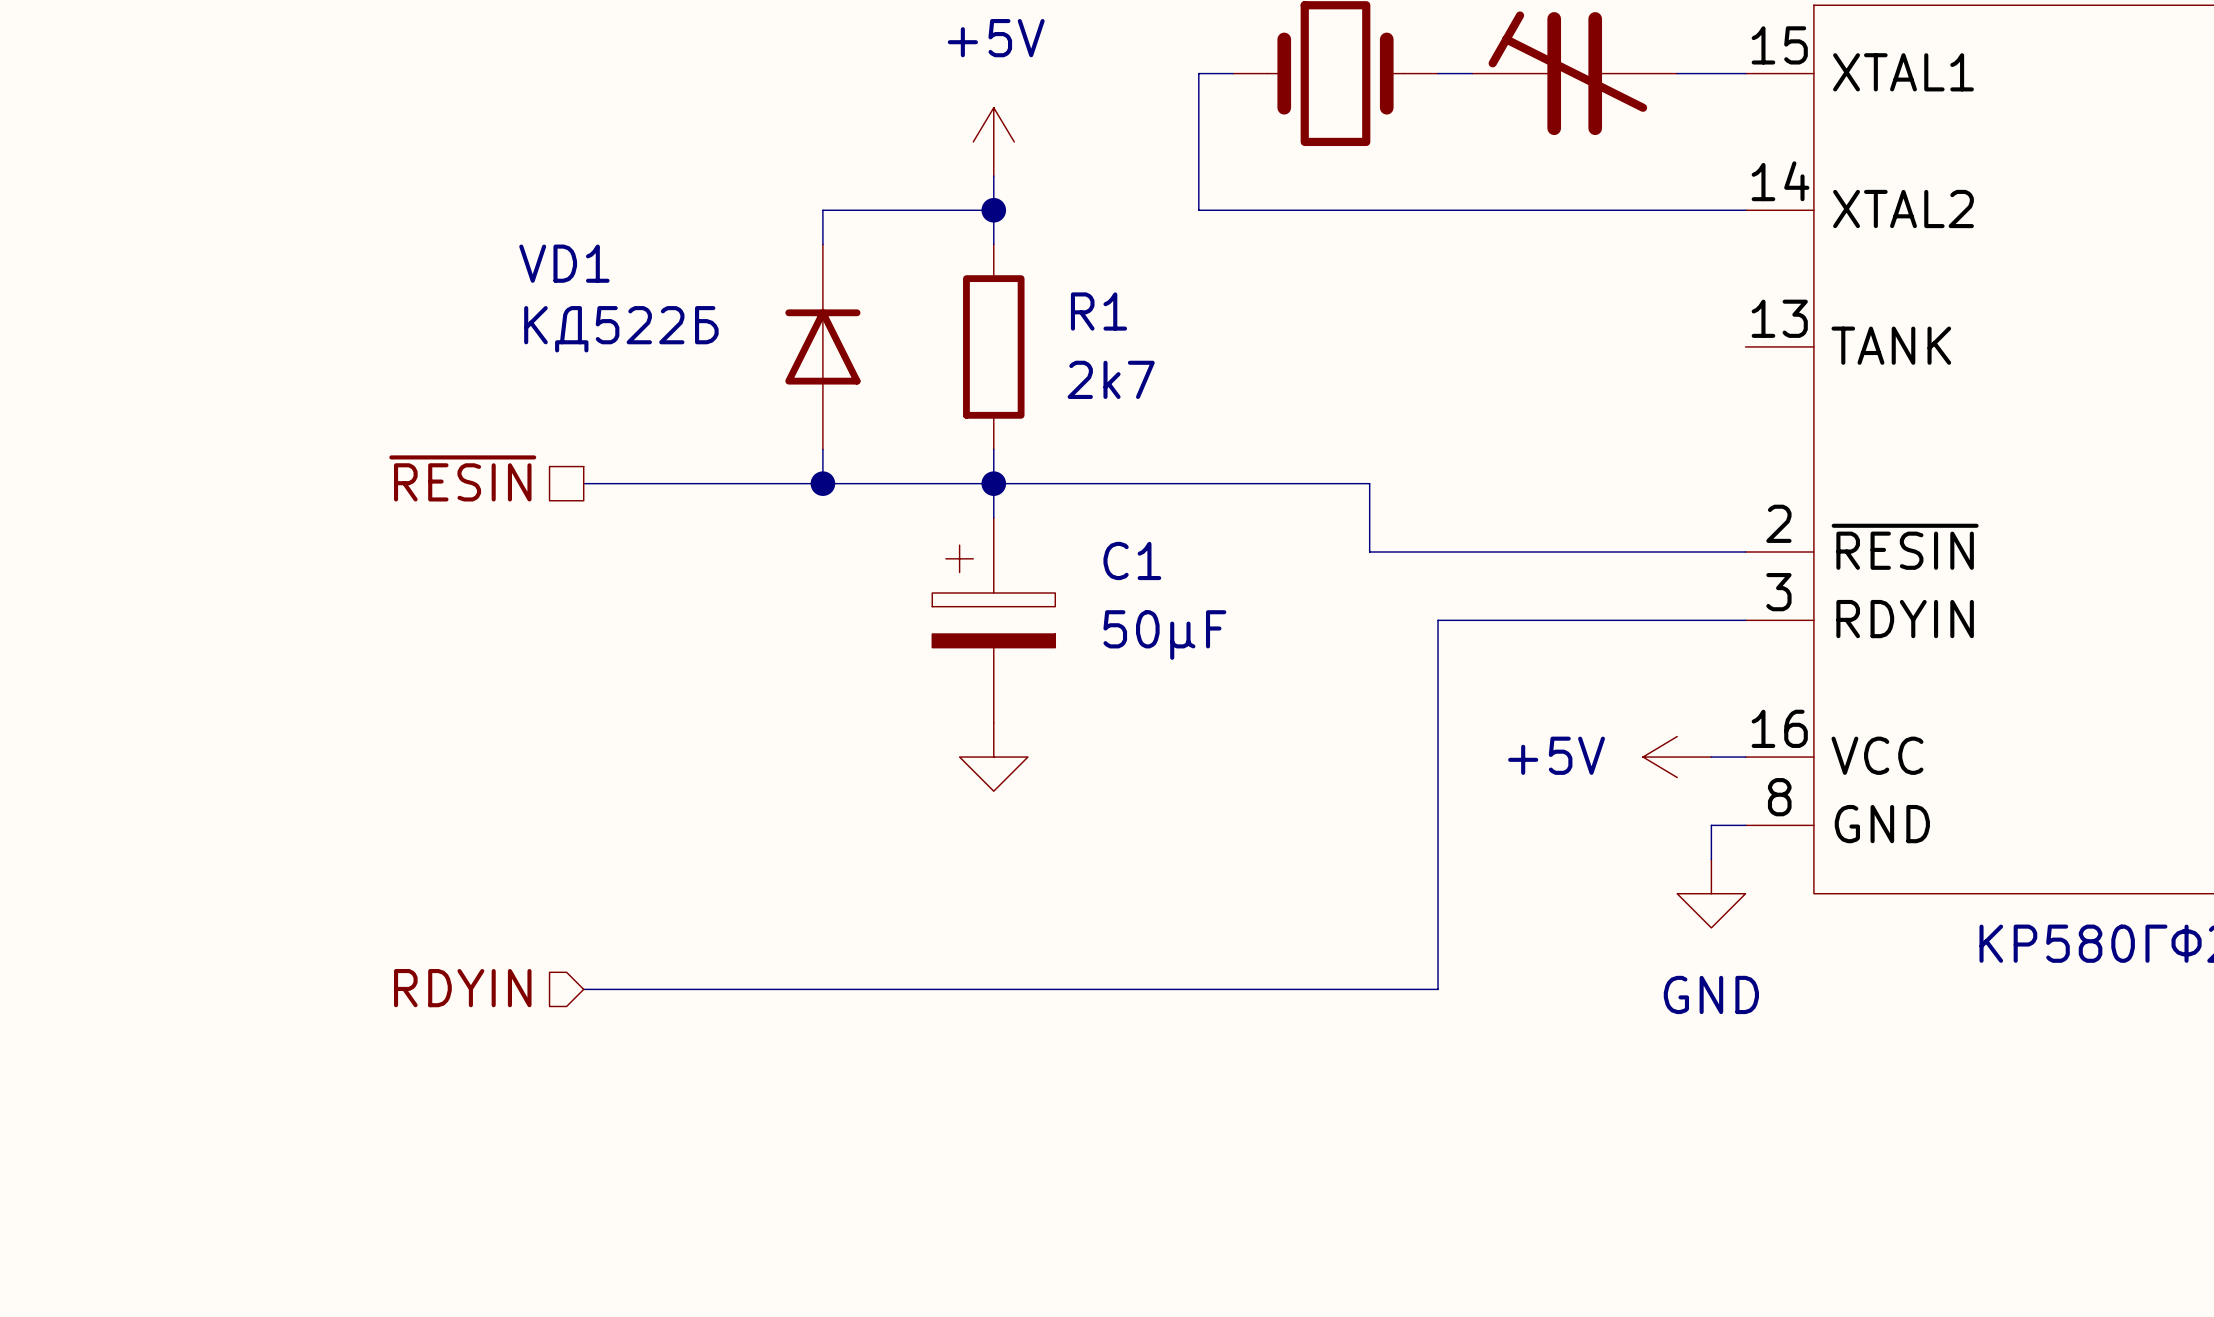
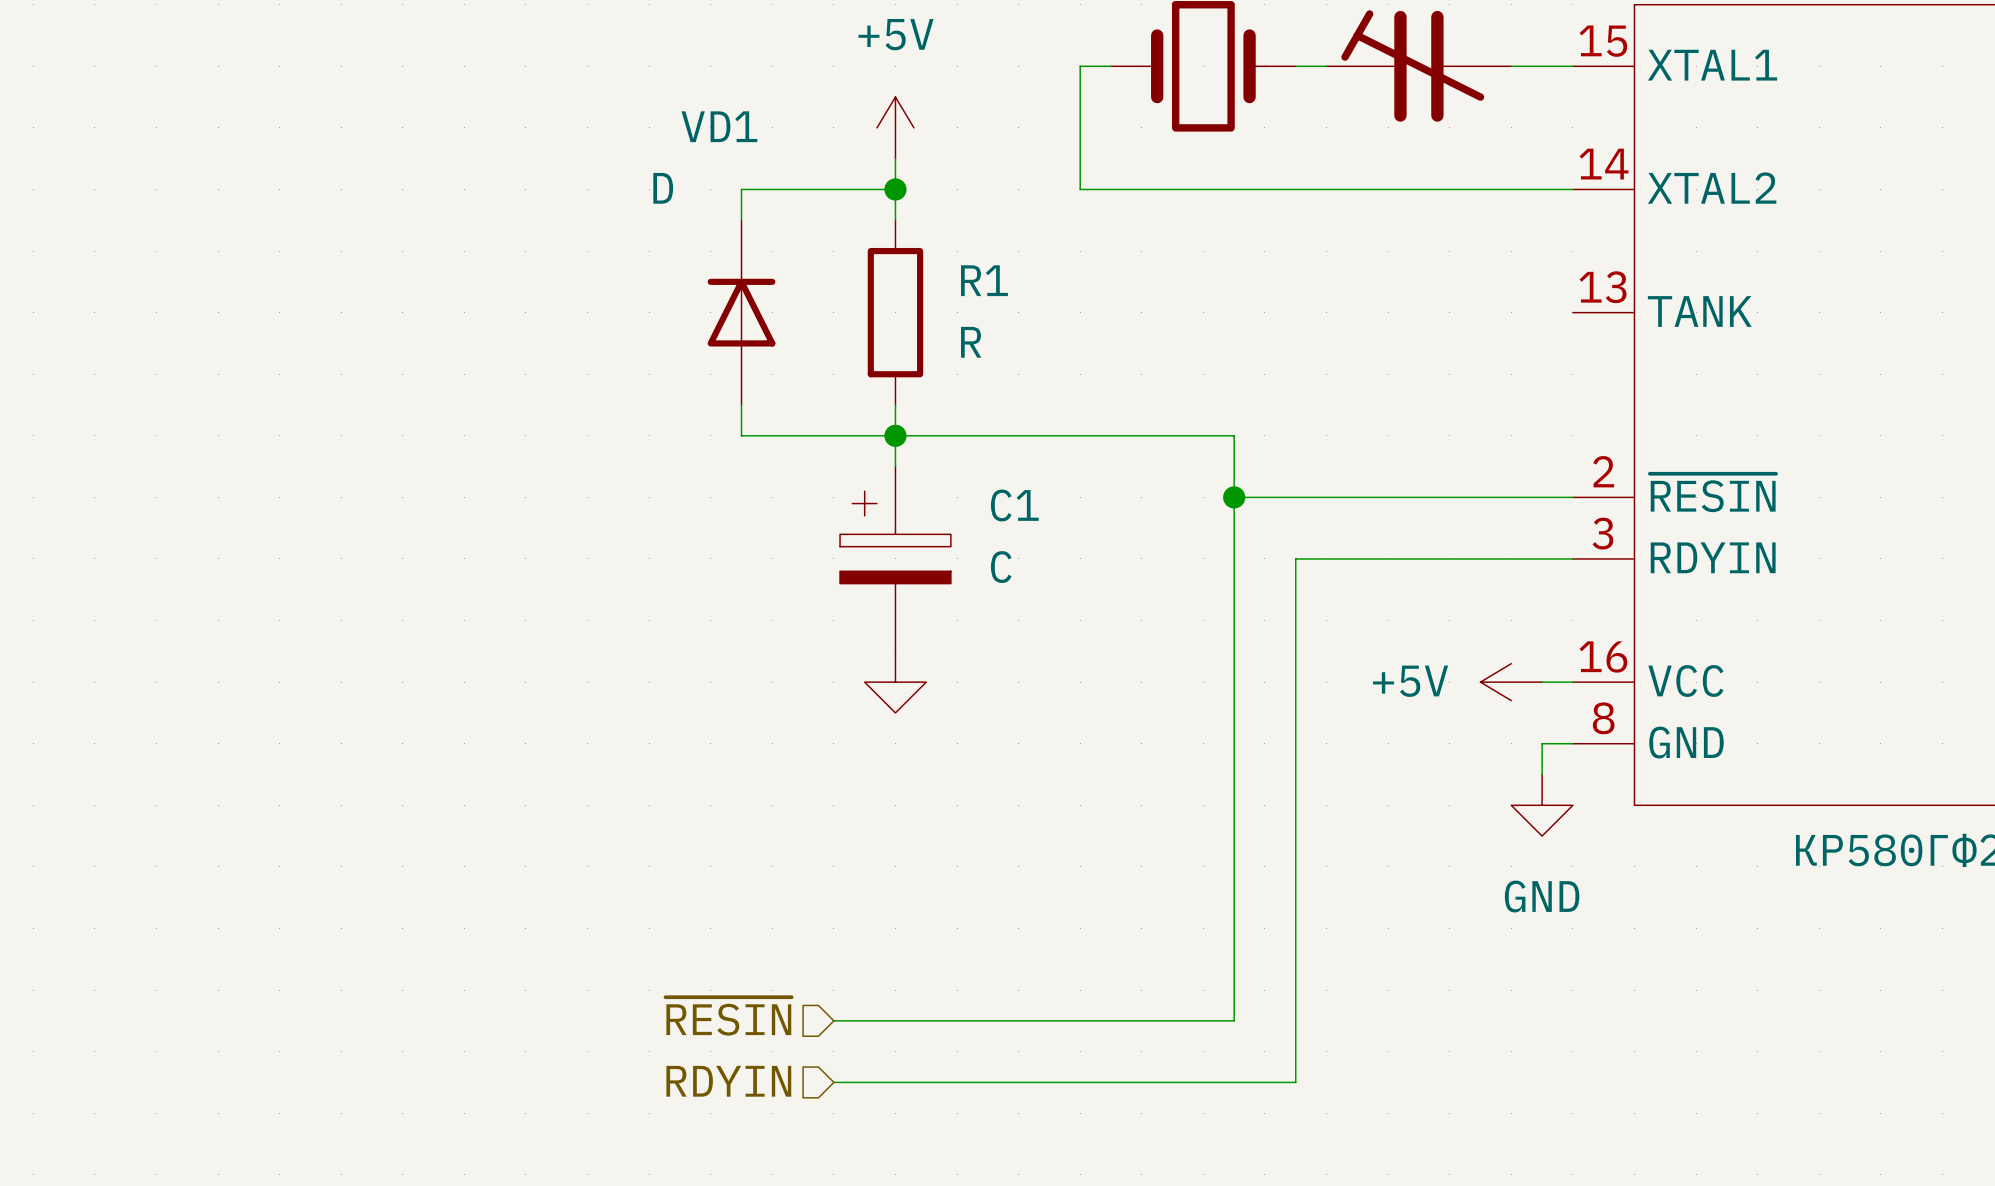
VD1 name position: VD1 (564, 263) -> VD1 (719, 126)
VD1 value: КД522Б (621, 329) -> D (663, 188)
R1 value: 2k7 (1111, 379) -> R (971, 342)
hierarchical label: ~{RESIN} (462, 478) -> none
wire: (583, 483) (822, 483) -> none
junction: (822, 483) -> none
wire: none -> (1234, 497) (1234, 1020) (833, 1020)
junction: none -> (1234, 497)
C1 value: 50μF (1164, 635) -> C (1001, 567)
hierarchical label position: RDYIN (462, 988) -> RDYIN (728, 1081)
wire: (583, 989) (1438, 989) -> (833, 1082) (1295, 1082) (1295, 891)
hierarchical label: none -> ~{RESIN} (728, 1016)

